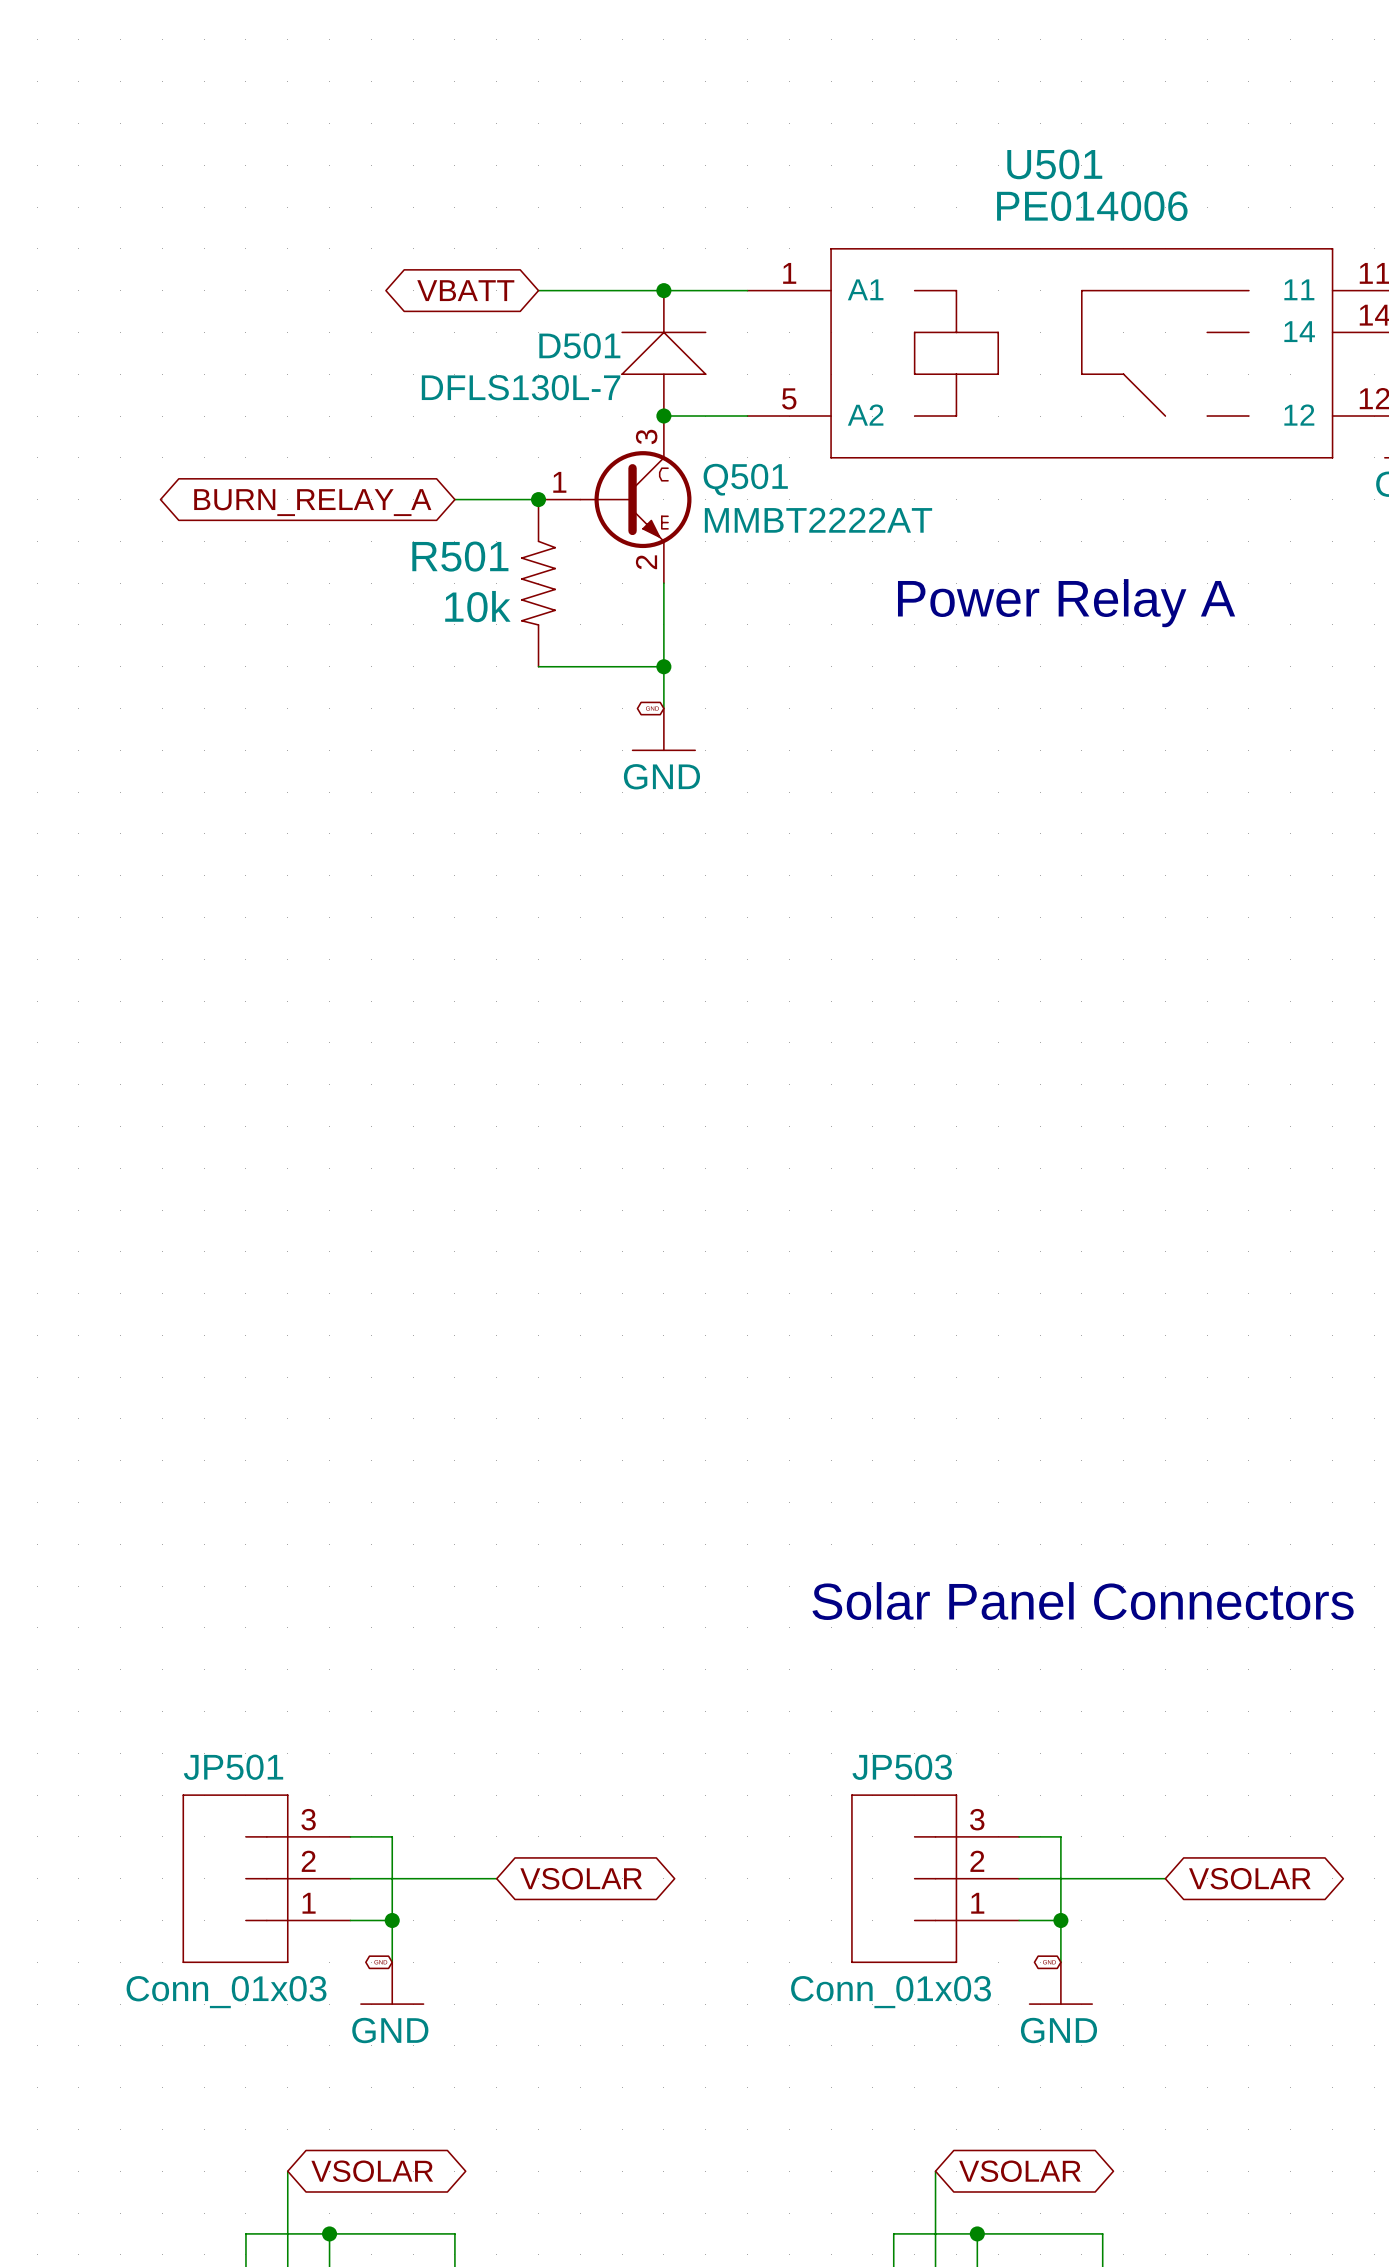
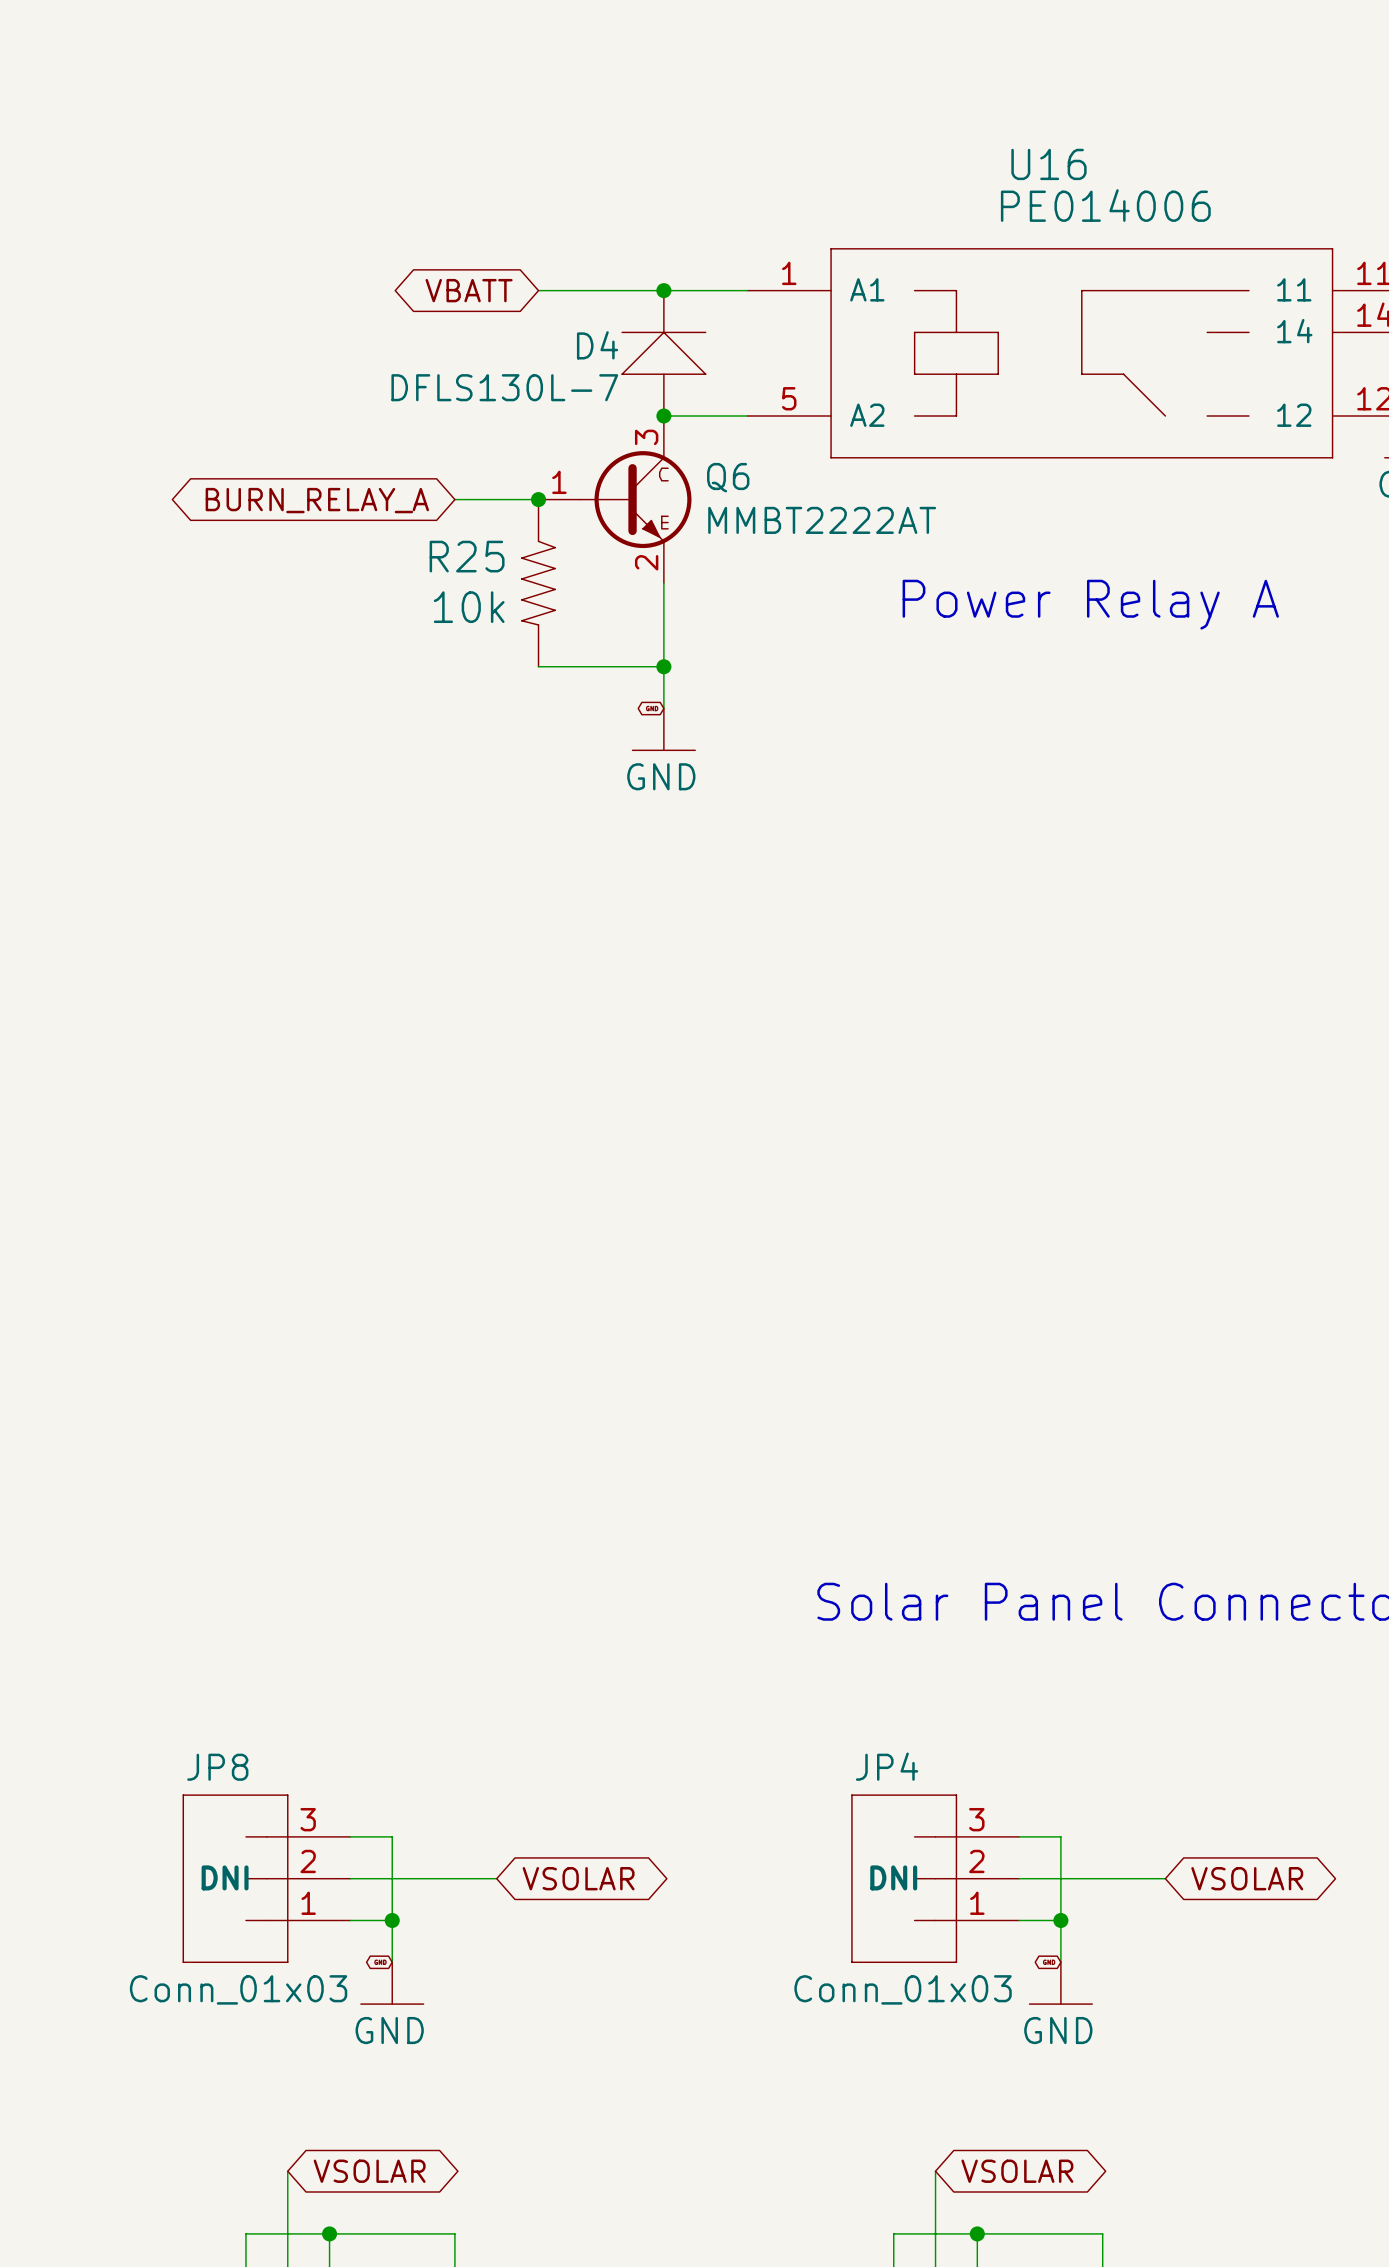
U501 name: U501 (1054, 164) -> U16 (1048, 164)
D501 name: D501 (579, 345) -> D4 (597, 345)
Q501 name: Q501 (745, 479) -> Q6 (728, 477)
R501 name: R501 (460, 556) -> R25 (467, 556)
JP501 name: JP501 (233, 1767) -> JP8 (217, 1767)
JP503 name: JP503 (902, 1767) -> JP4 (887, 1766)
JP501 text: none -> DNI (225, 1877)
JP503 text: none -> DNI (893, 1877)

